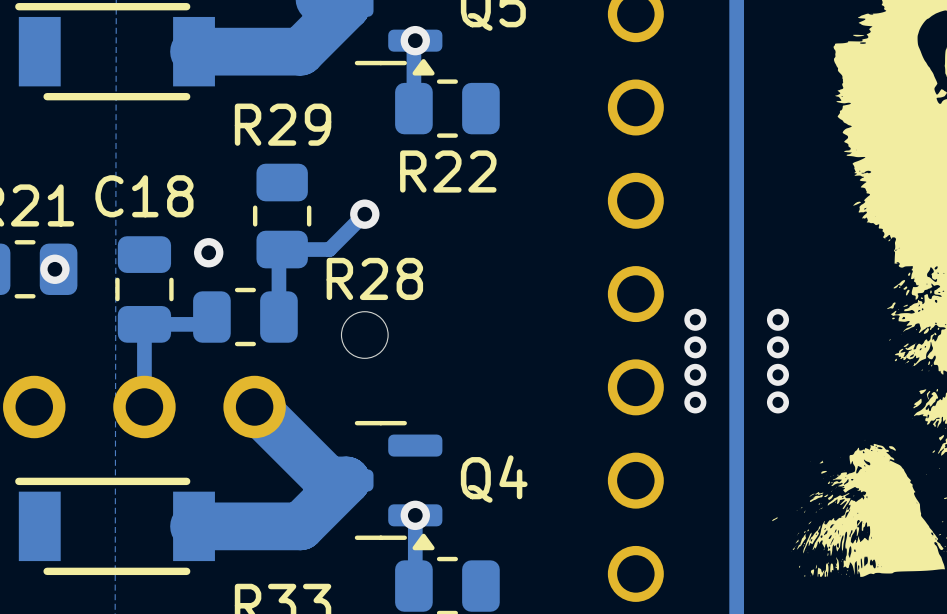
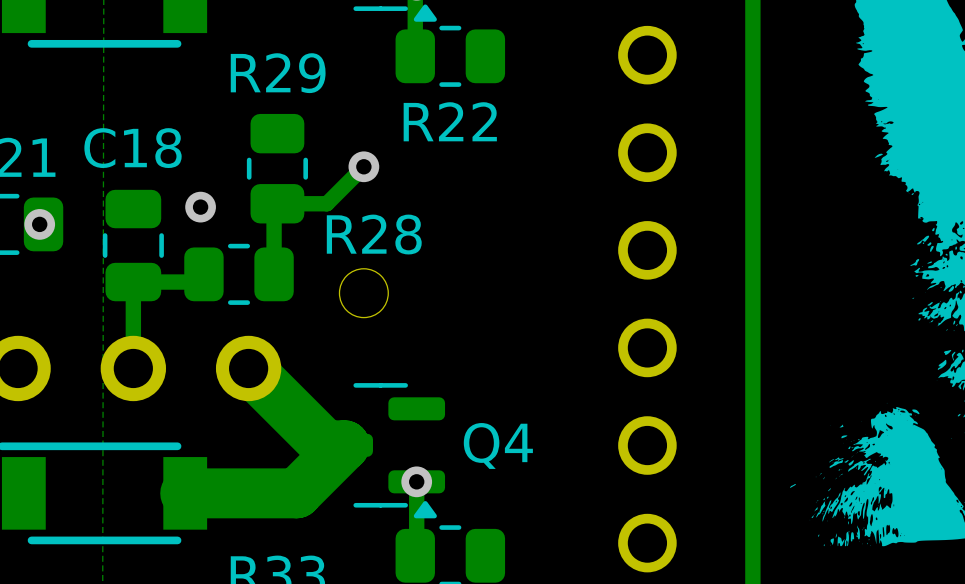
via: (695, 319) -> none
via: (777, 319) -> none
via: (695, 347) -> none
via: (777, 347) -> none
via: (695, 374) -> none
via: (777, 374) -> none
via: (695, 402) -> none
via: (777, 402) -> none

